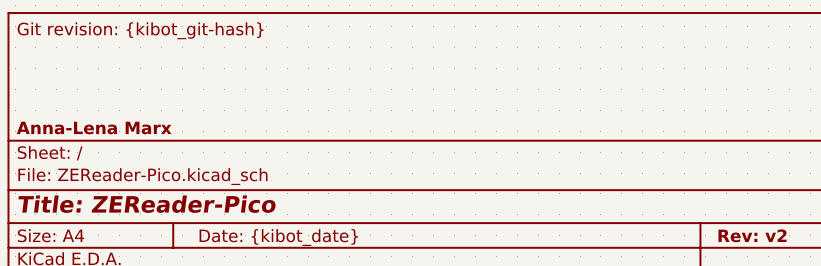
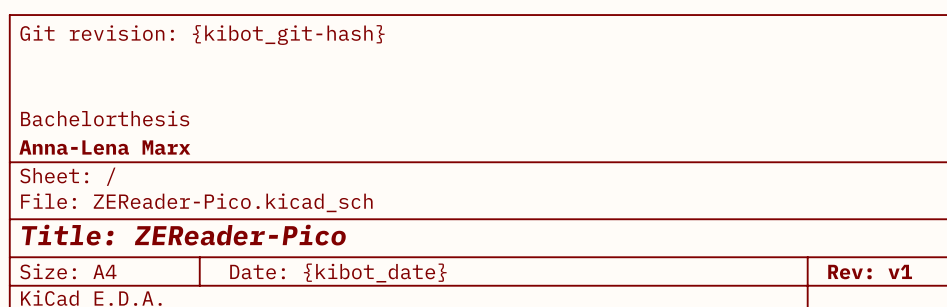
title block: none -> Bachelorthesis (105, 118)
title block: Rev: v2 (752, 235) -> Rev: v1 (870, 272)

